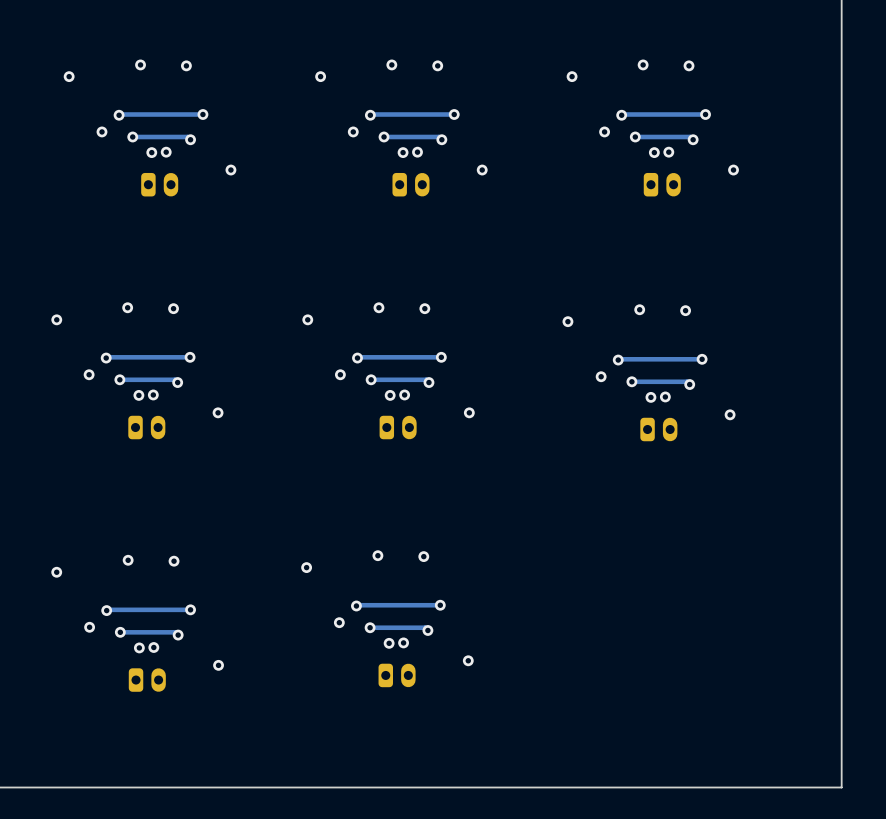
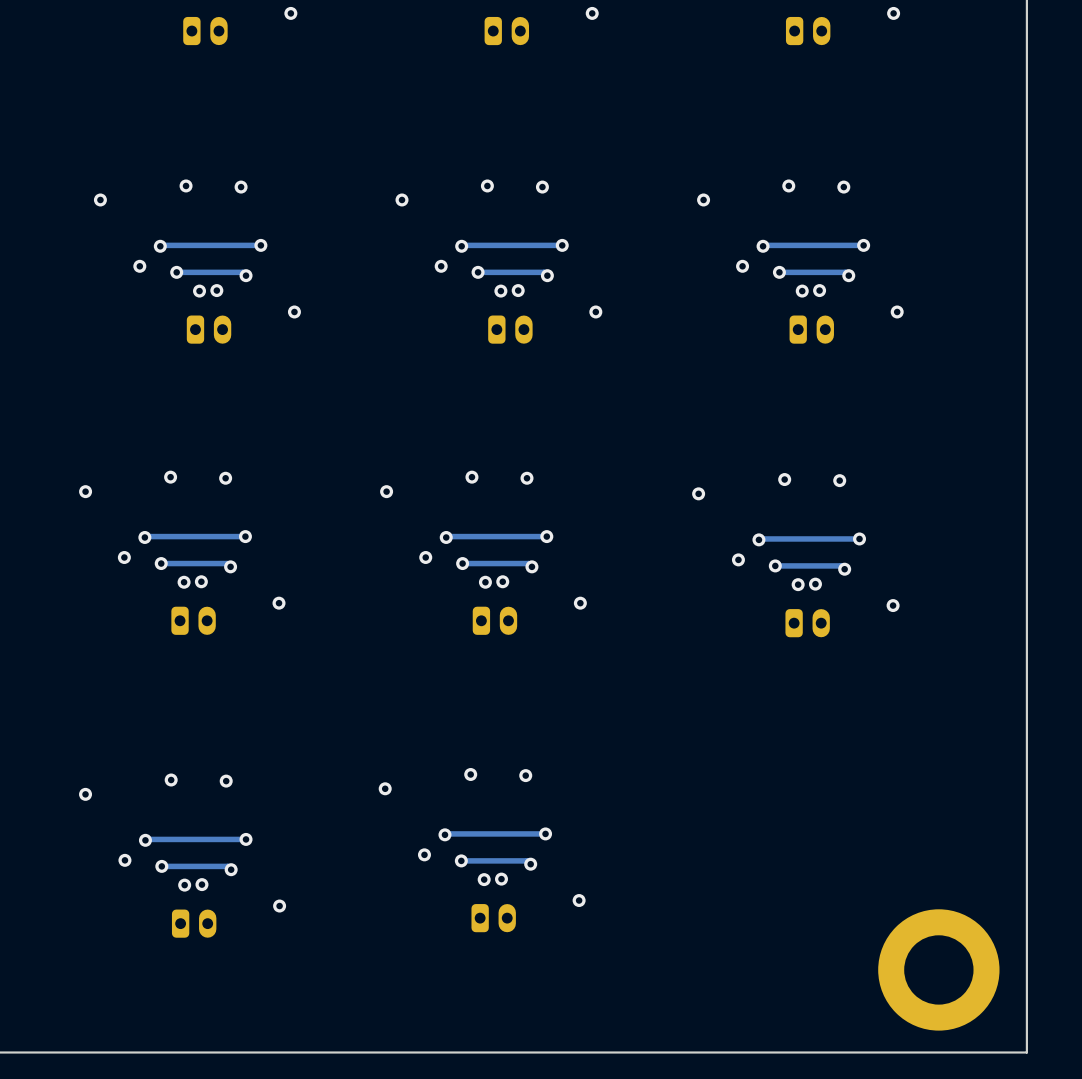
part: none -> (938, 969)

